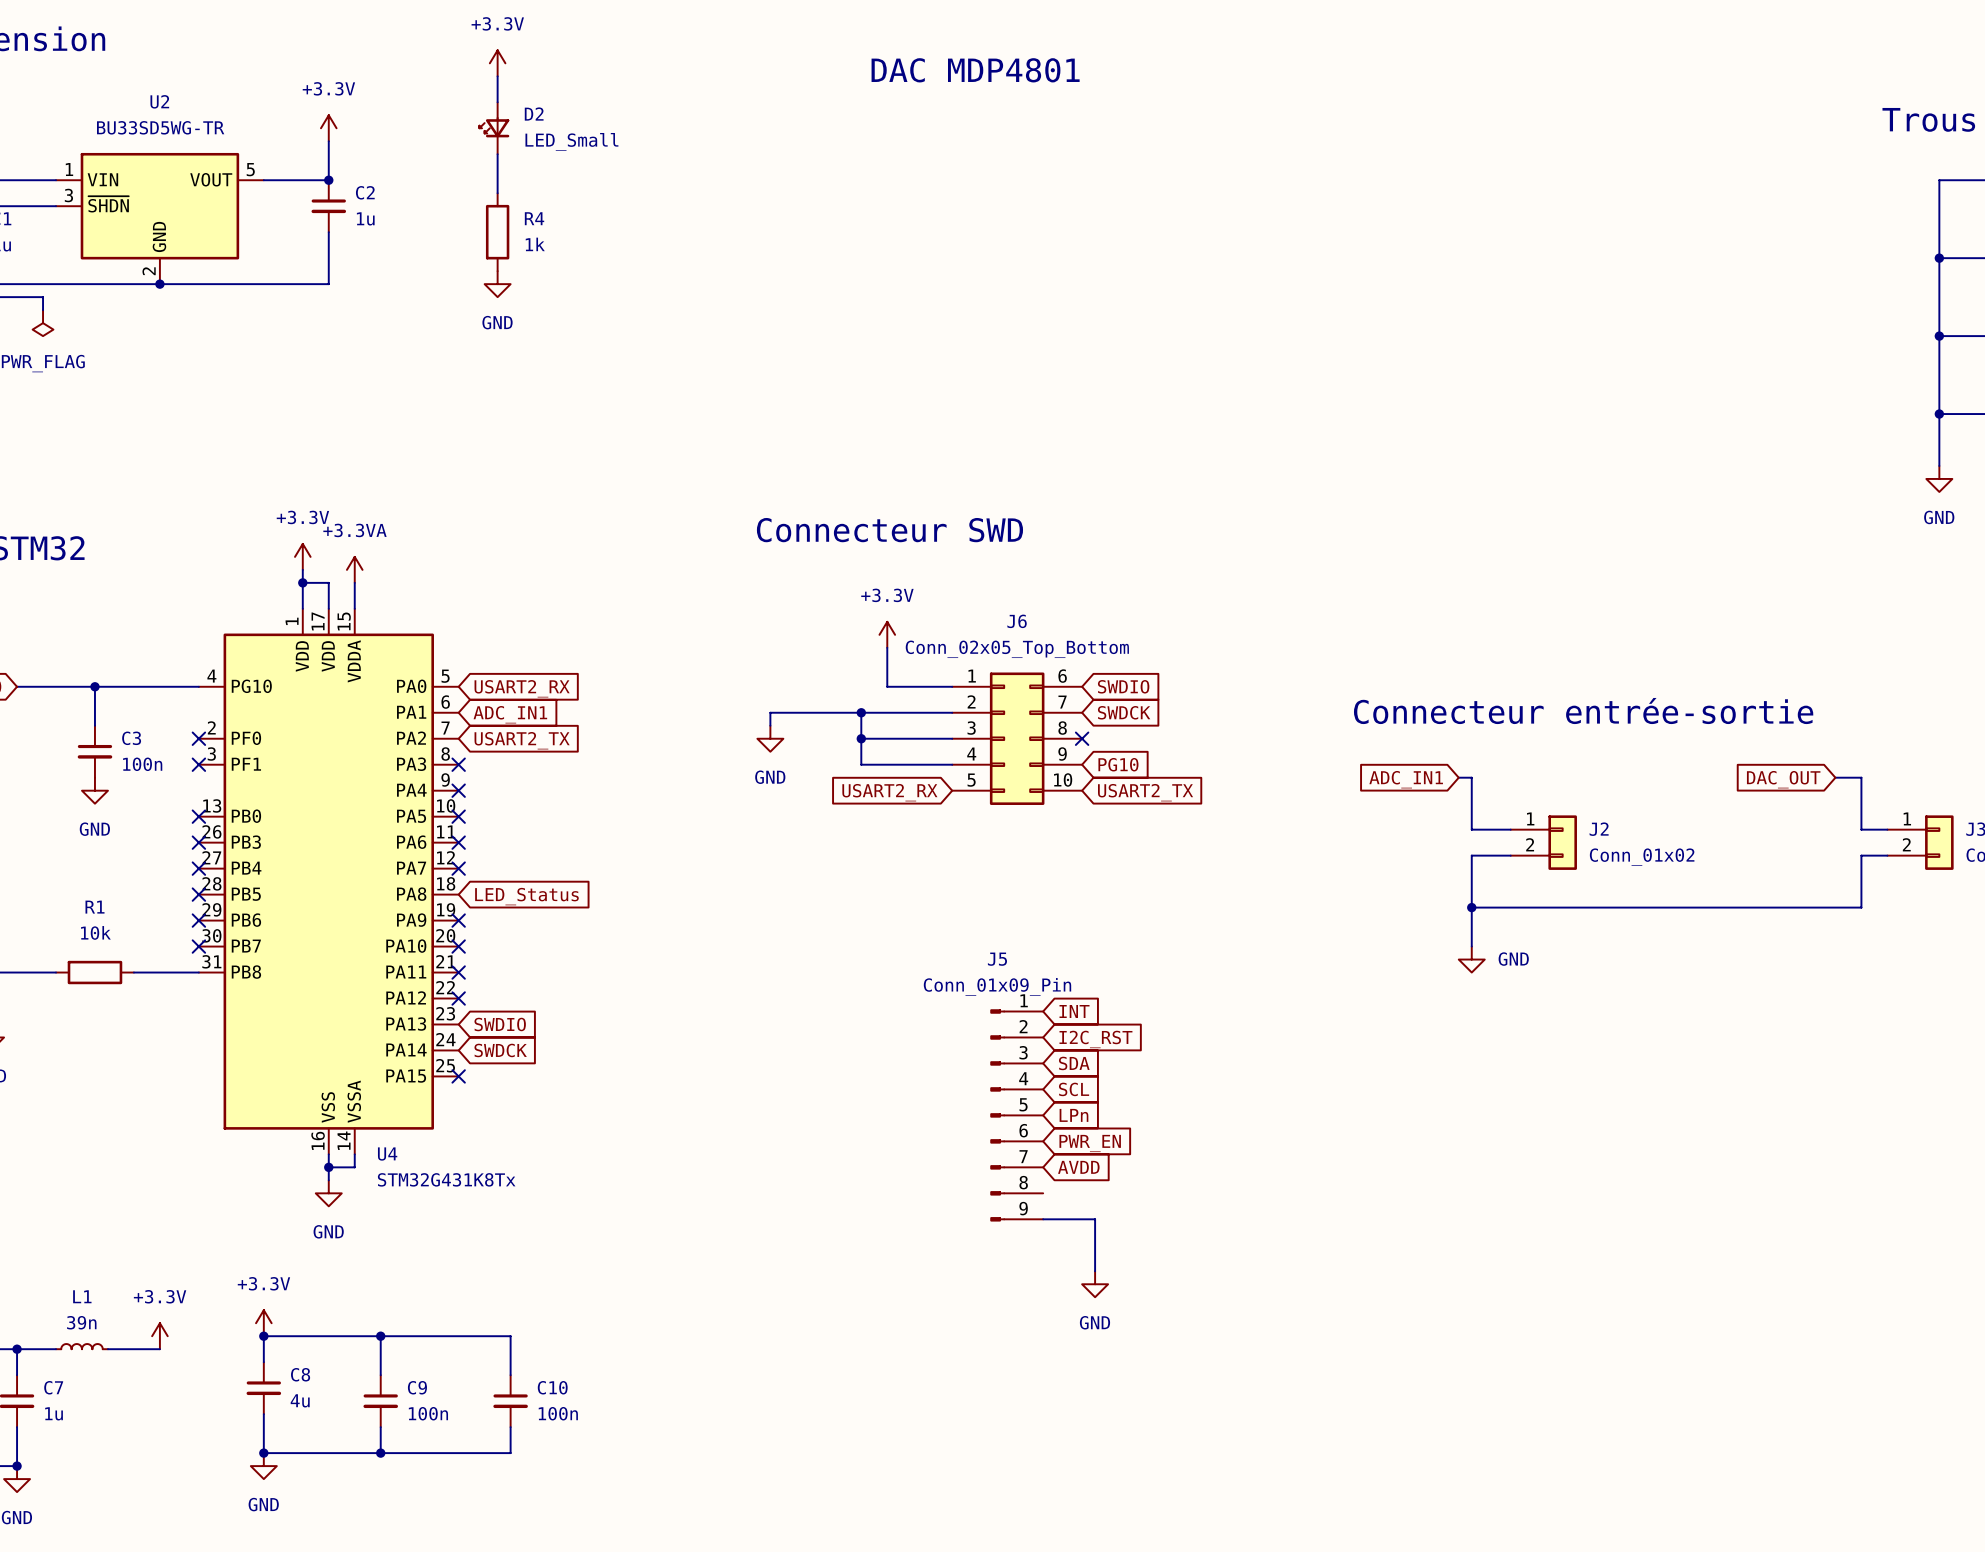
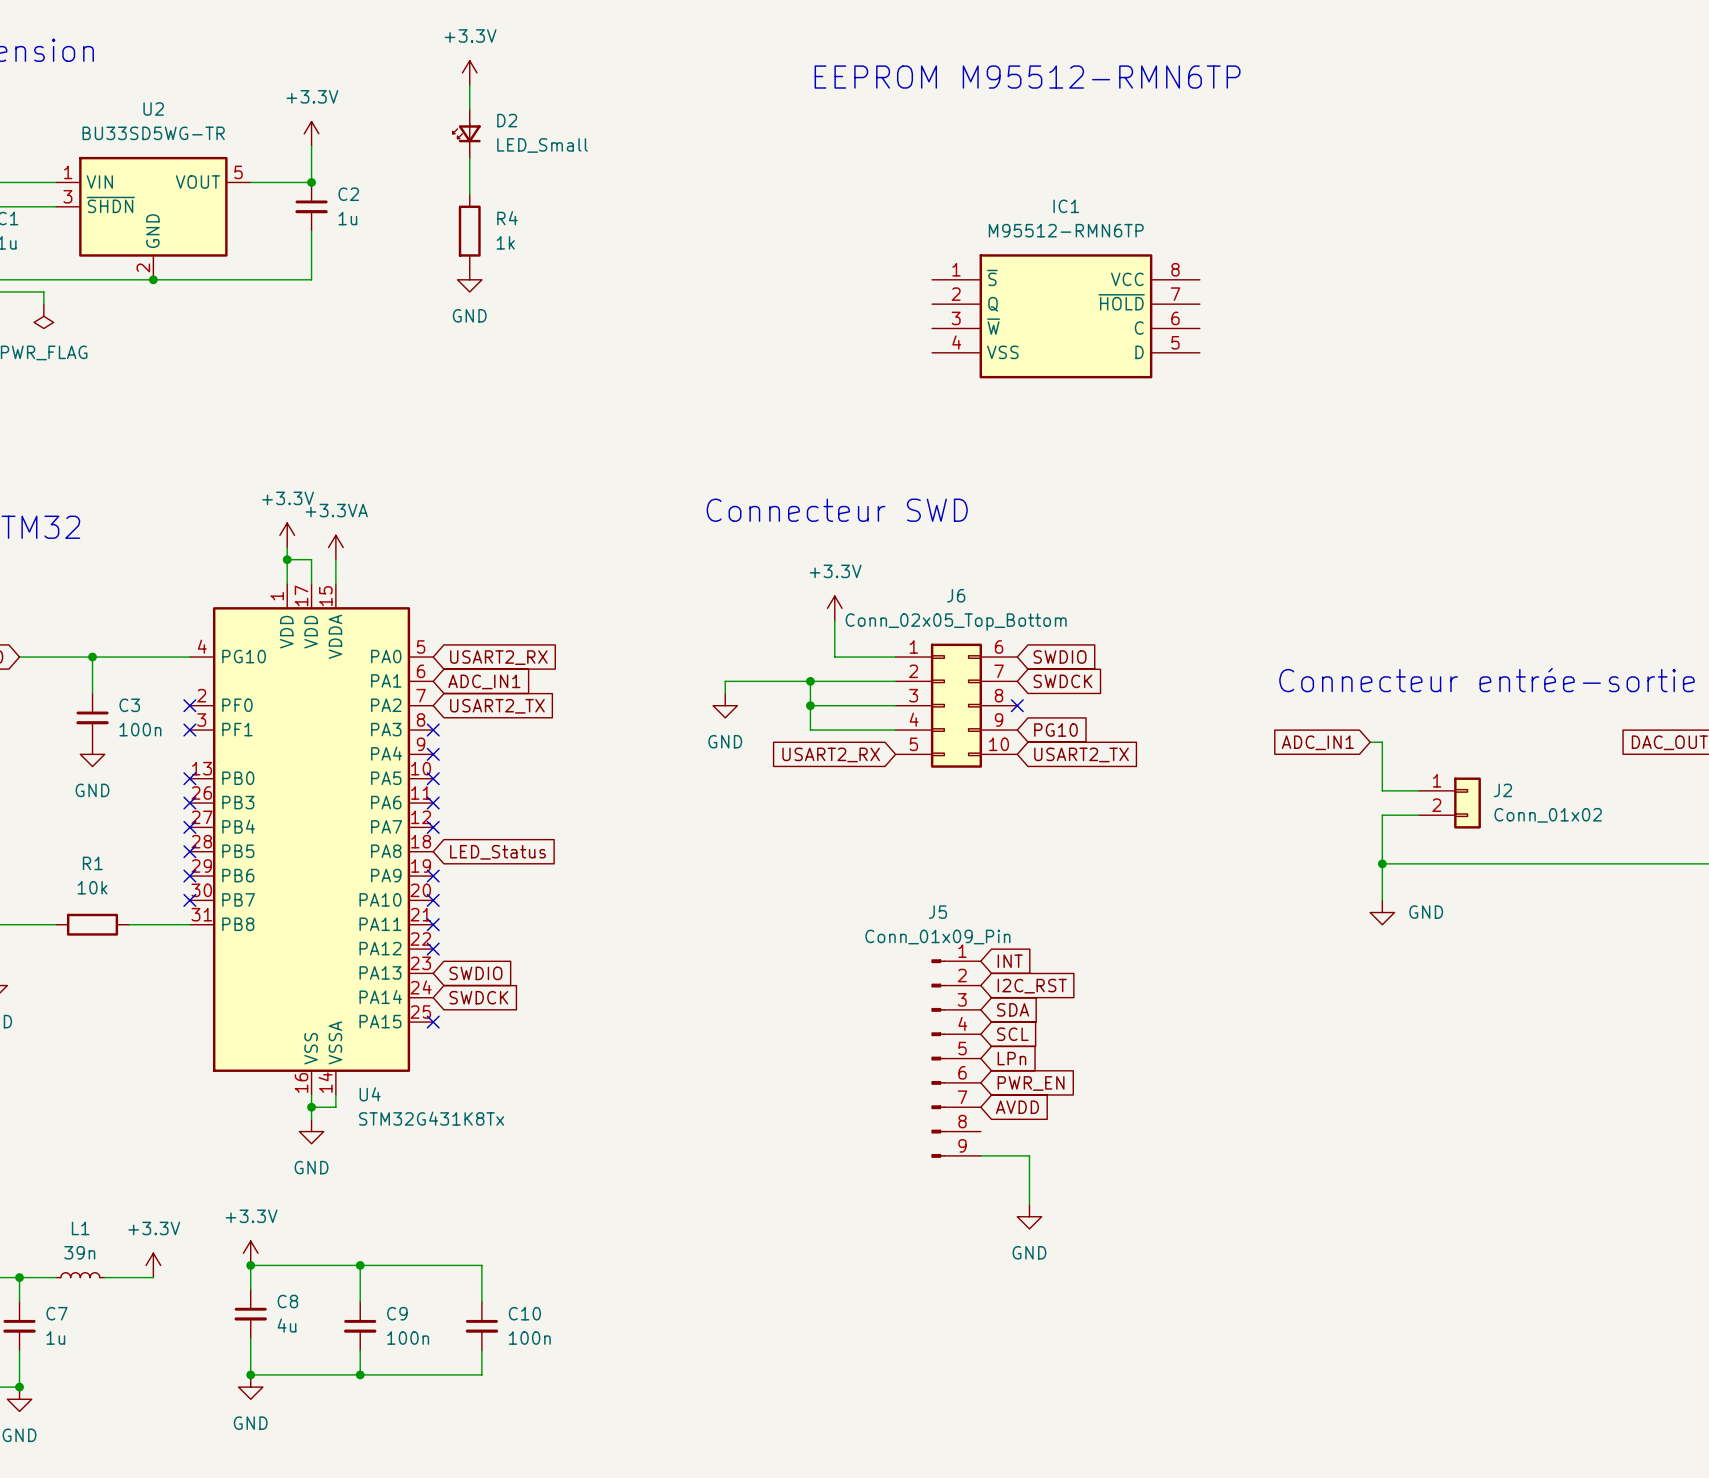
text: none -> EEPROM M95512-RMN6TP (1027, 77)
text: DAC MDP4801 (975, 70) -> none
IC1: none -> M95512-RMN6TP (1065, 316)

